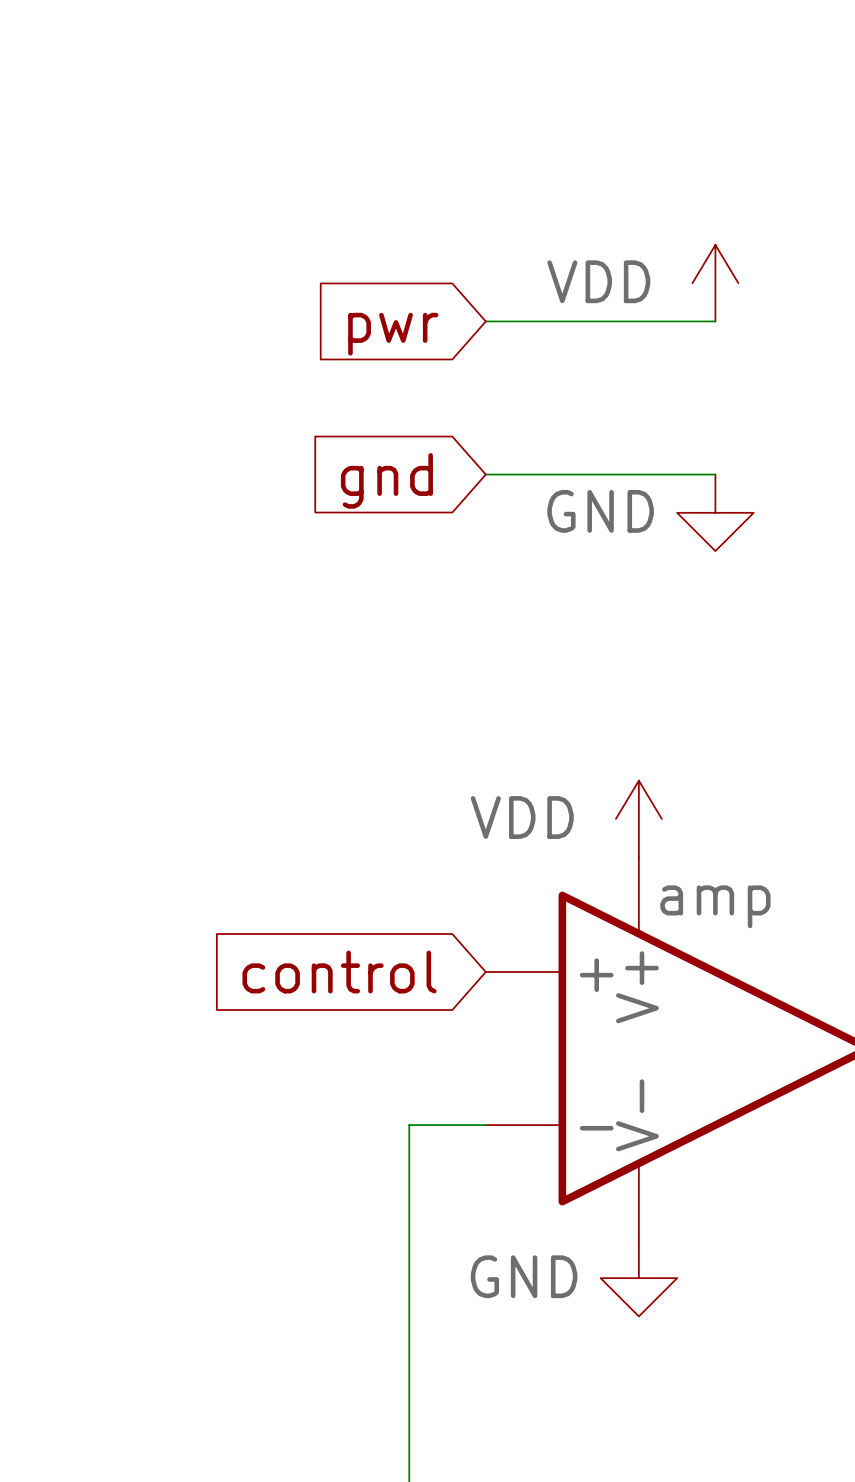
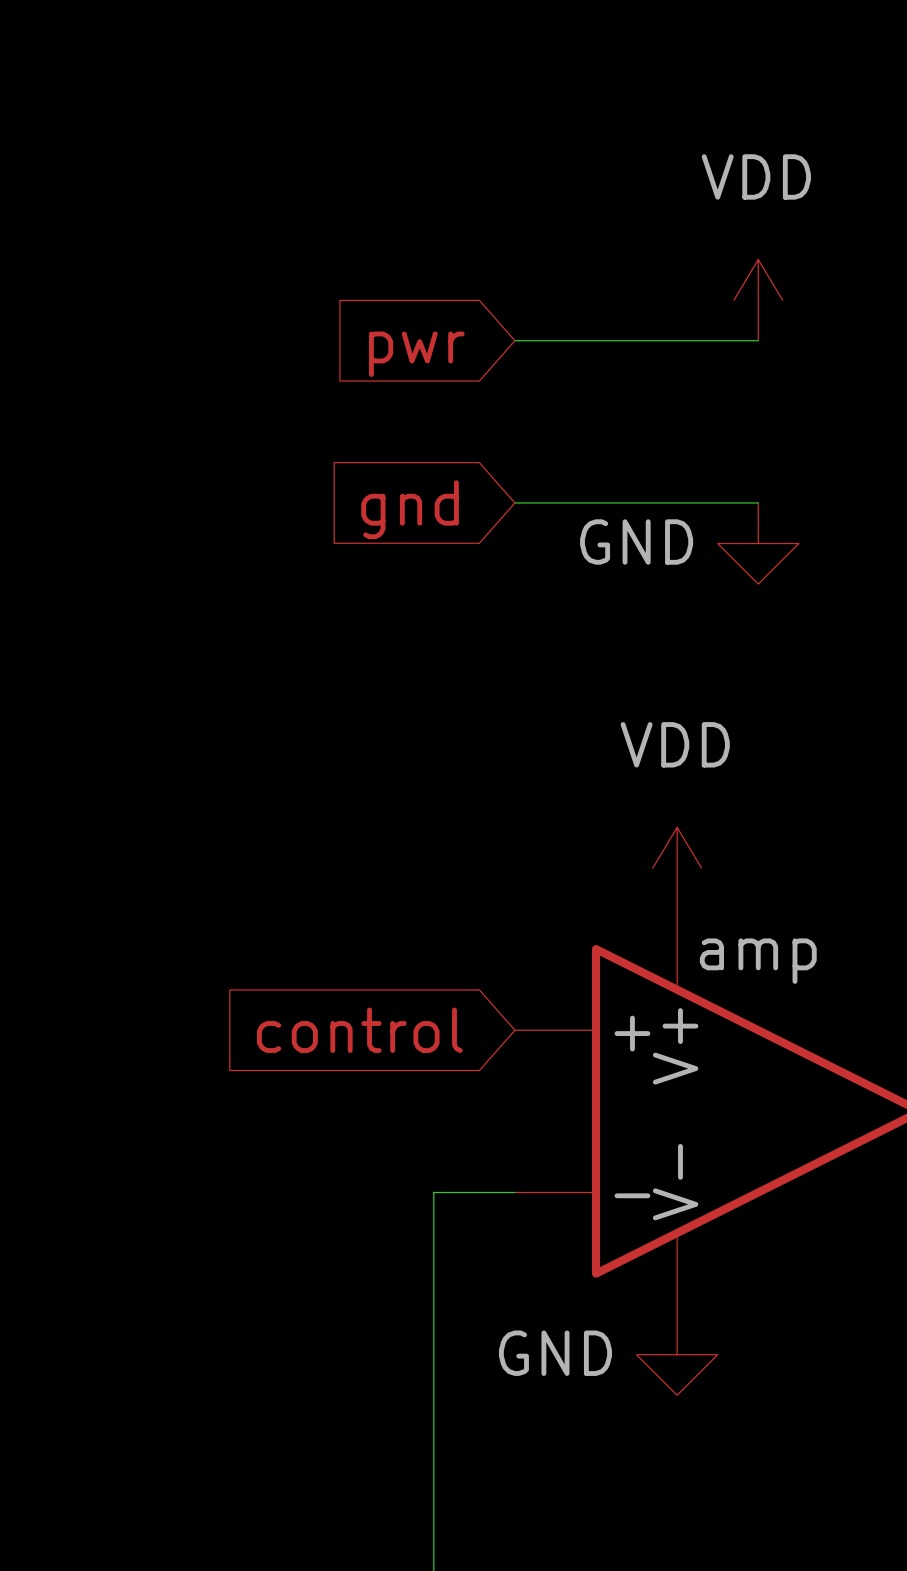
power symbol text position: VDD (598, 281) -> VDD (756, 176)
power symbol text position: VDD (522, 817) -> VDD (675, 744)

